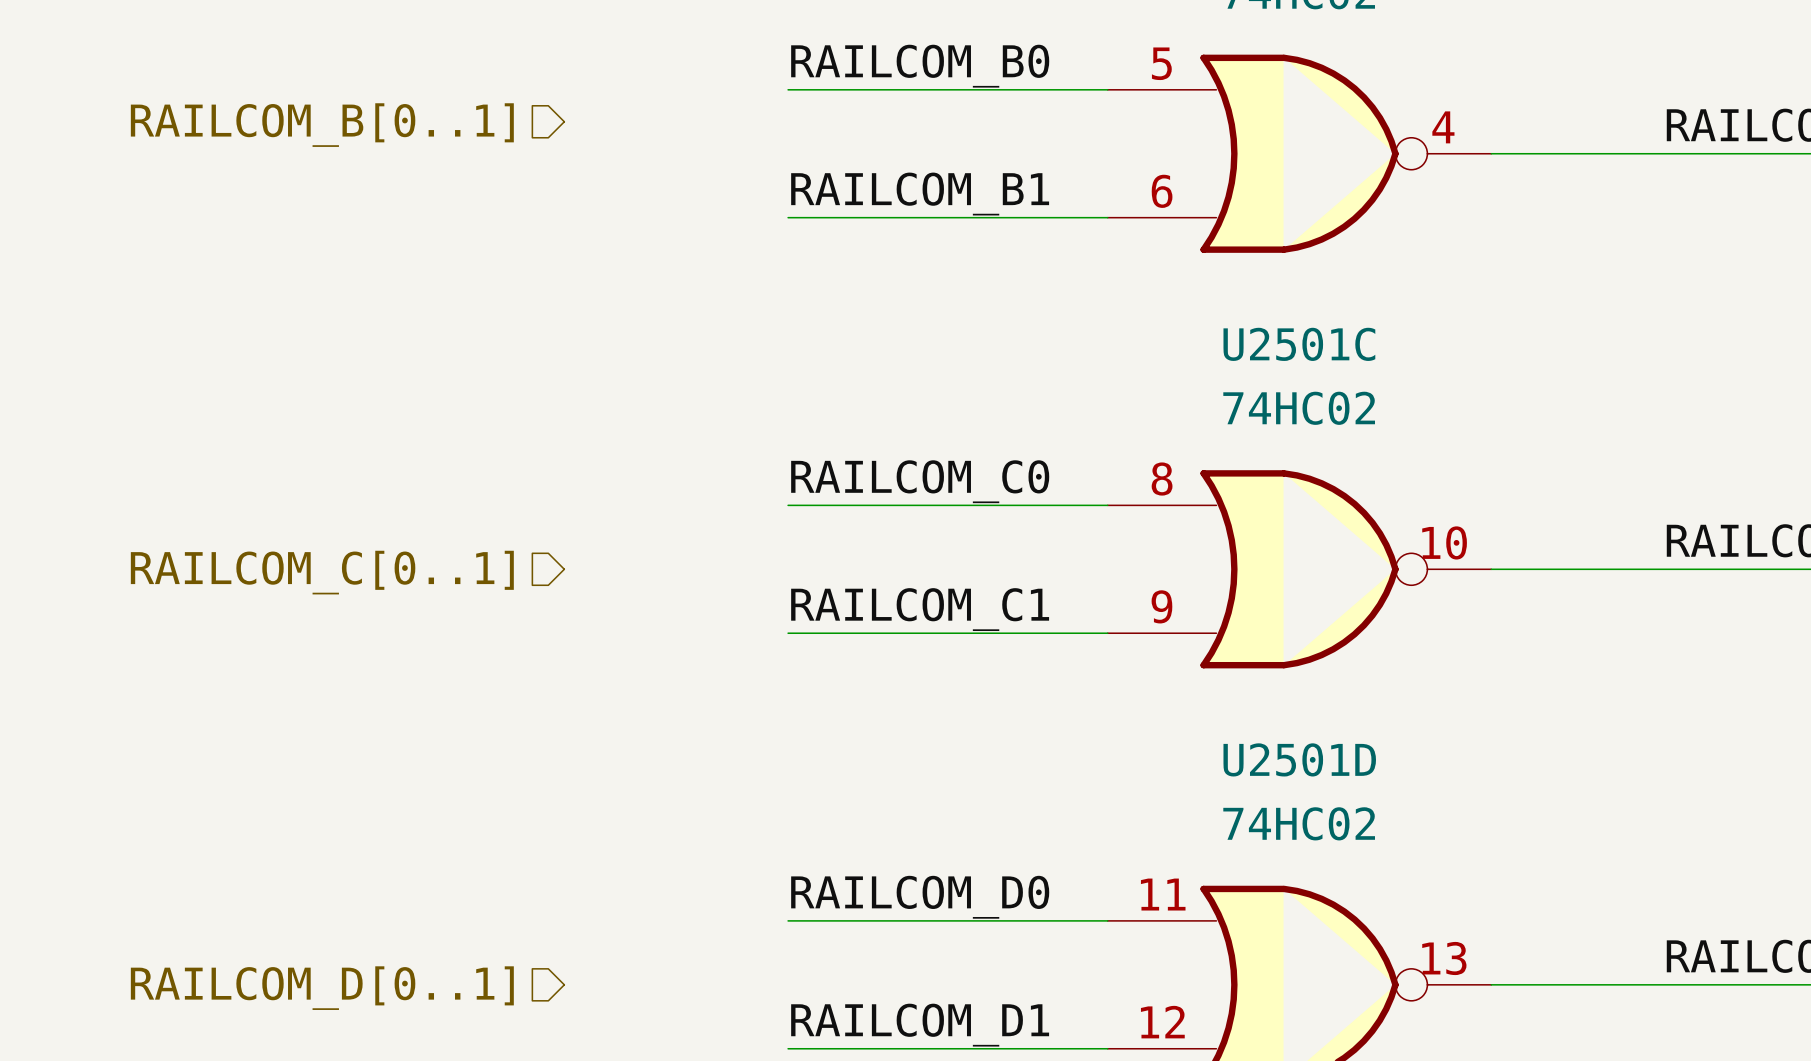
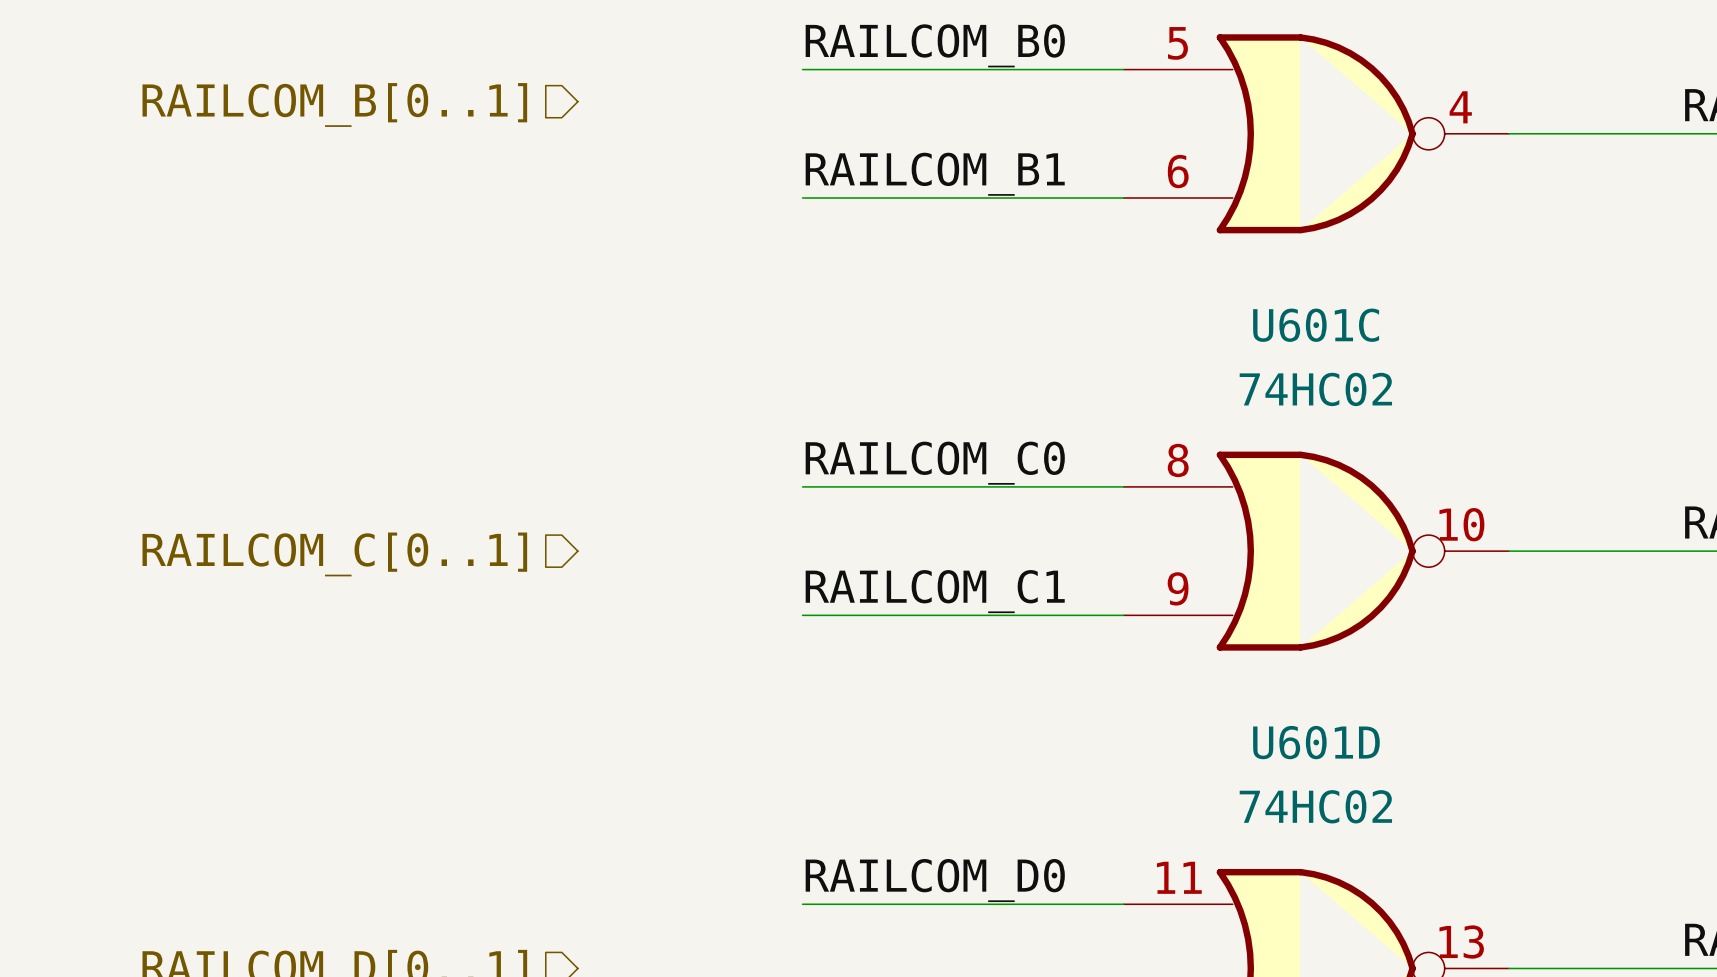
U2501C name: U2501C (1299, 344) -> U601C (1316, 325)
U2501D name: U2501D (1299, 759) -> U601D (1316, 742)

